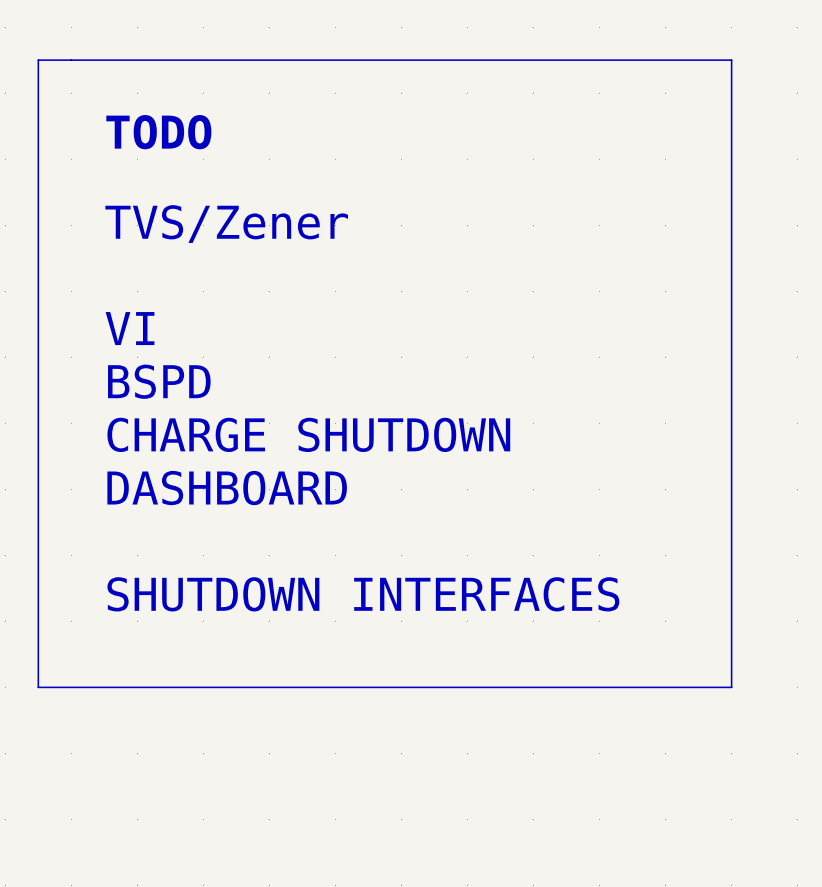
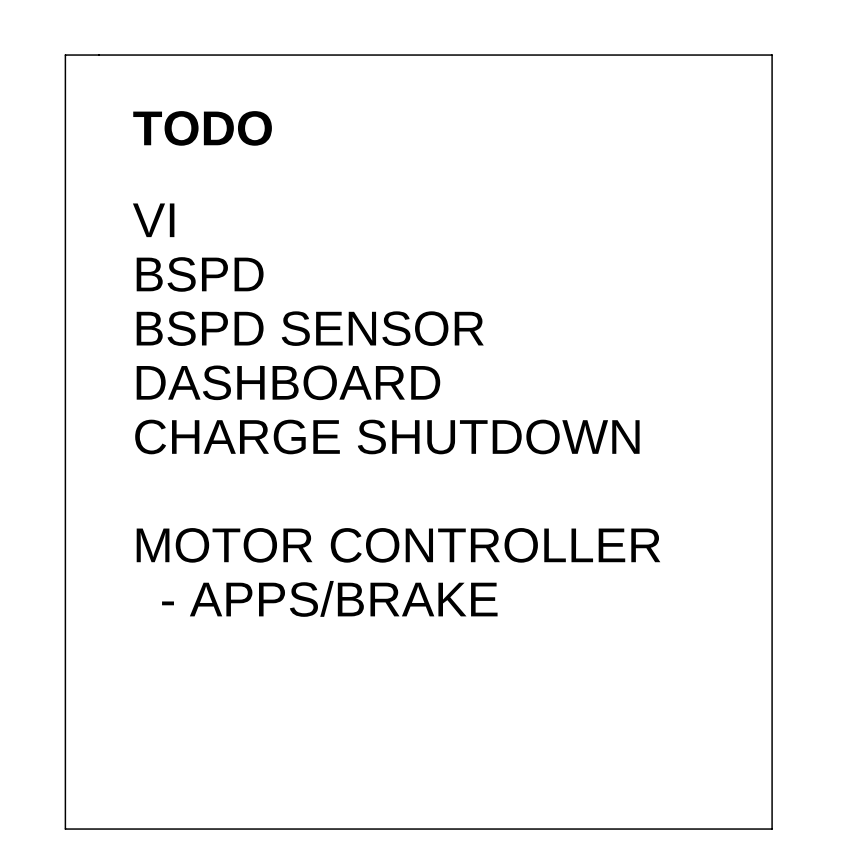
text: TVS/Zener (226, 224) -> VI (153, 220)
text: none -> BSPD (200, 274)
text: VI (130, 328) -> BSPD SENSOR (310, 328)
text: BSPD (159, 381) -> DASHBOARD (288, 382)
text: DASHBOARD (227, 488) -> none
text: none -> MOTOR CONTROLLER (398, 545)
text: SHUTDOWN INTERFACES (363, 594) -> - APPS/BRAKE (329, 598)
line: (38, 687) (731, 687) -> (65, 694) (65, 829) (772, 829) (772, 694)

